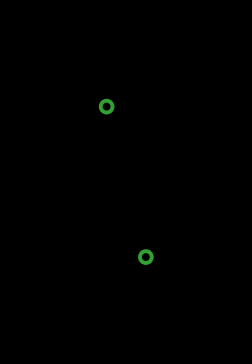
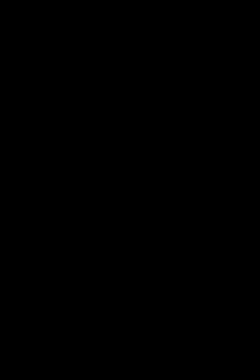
via: (106, 106) -> none
via: (145, 257) -> none

